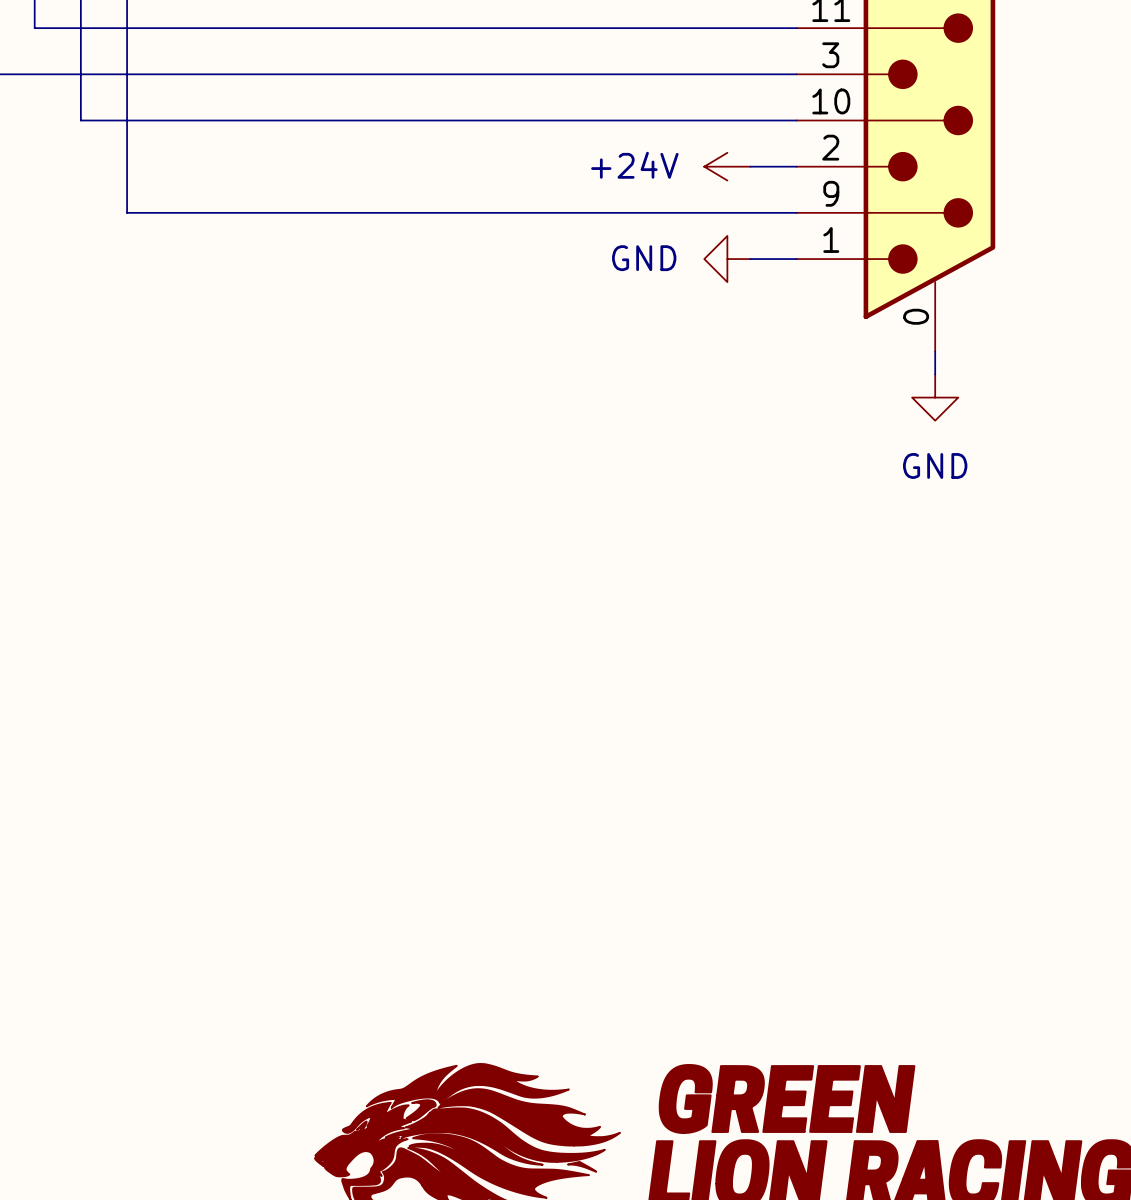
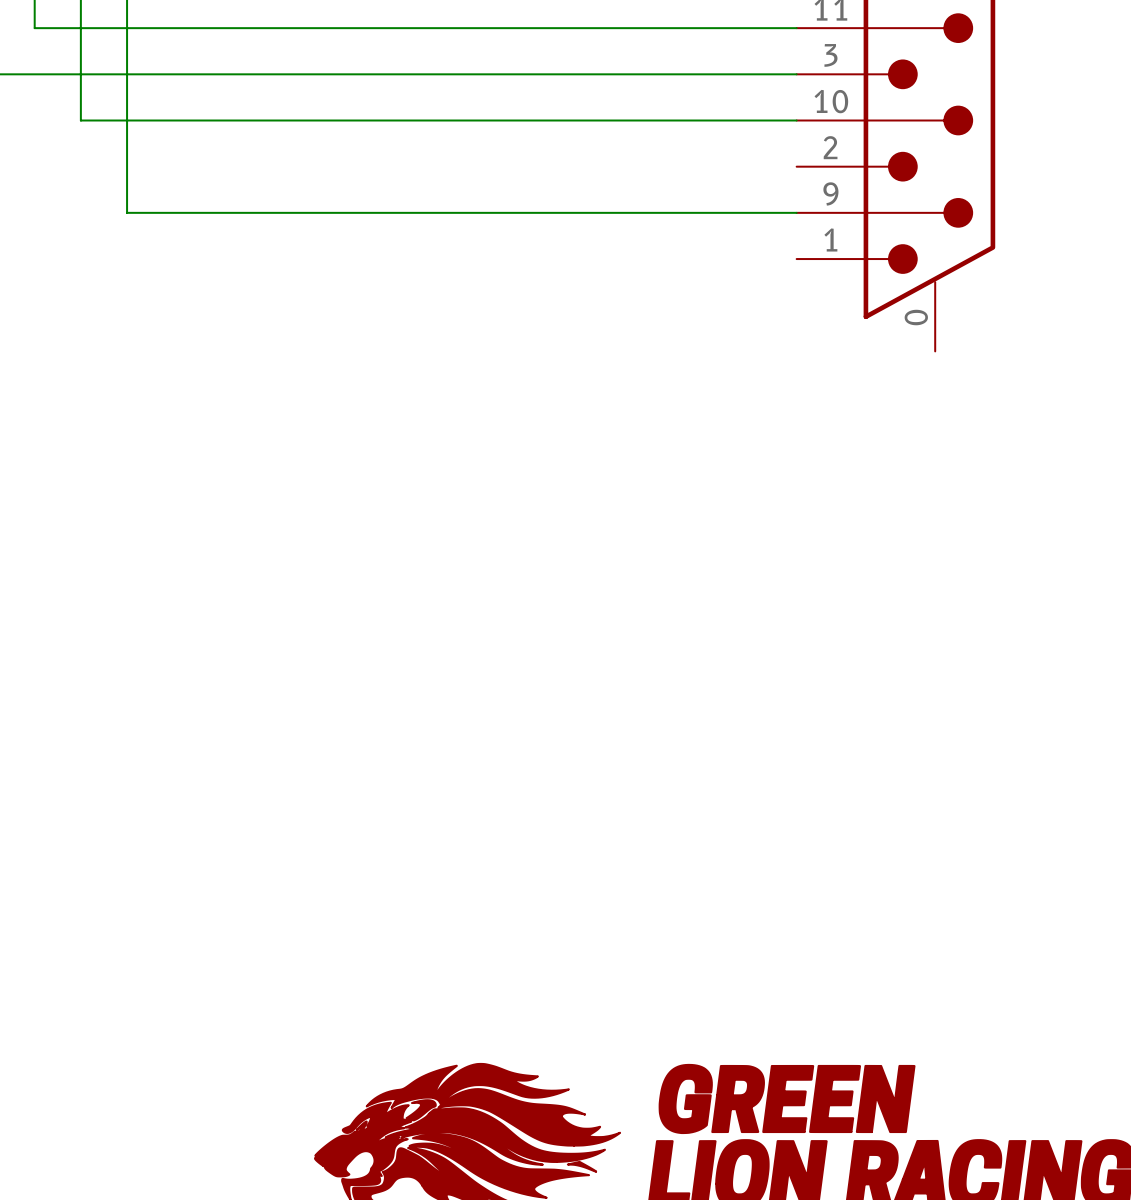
power symbol: +24V (727, 166) -> none
wire: (750, 166) (796, 166) -> none
power symbol: GND (727, 259) -> none
wire: (750, 259) (796, 259) -> none
wire: (935, 351) (935, 374) -> none
power symbol: GND (935, 397) -> none

